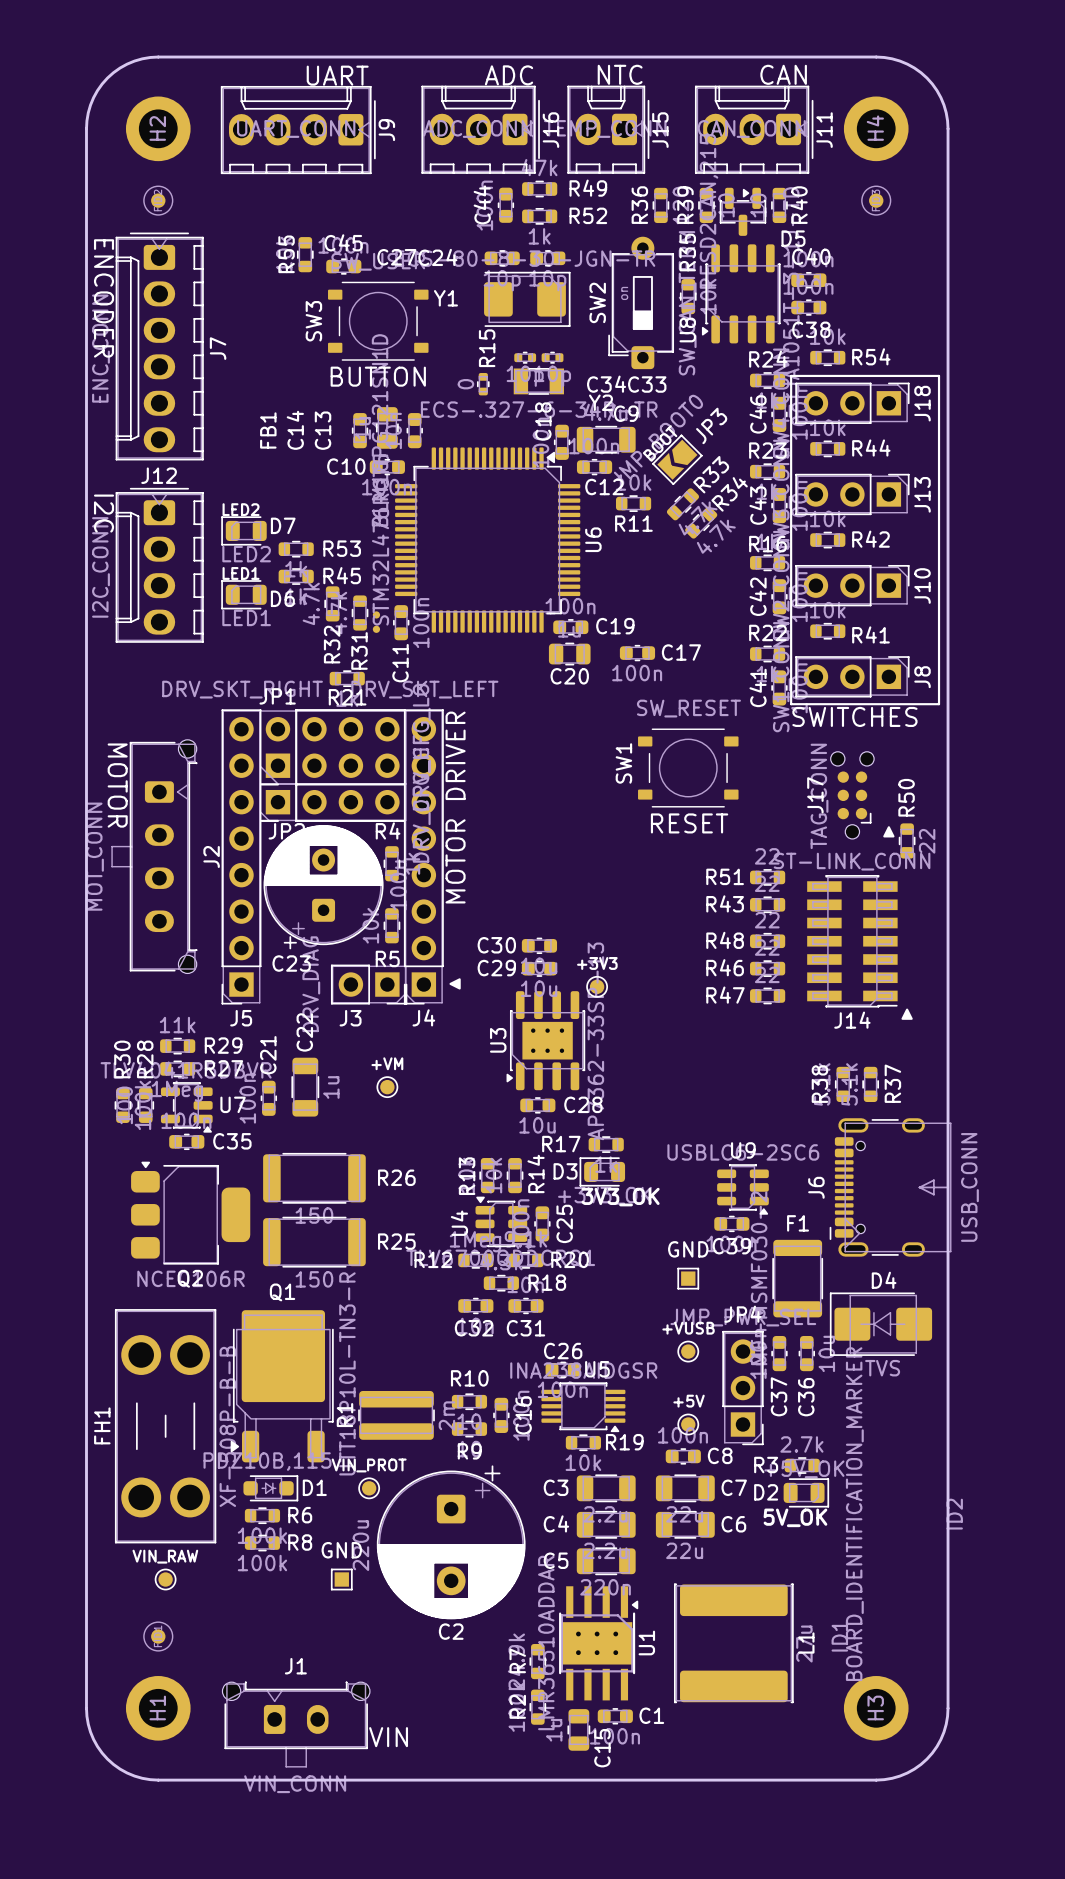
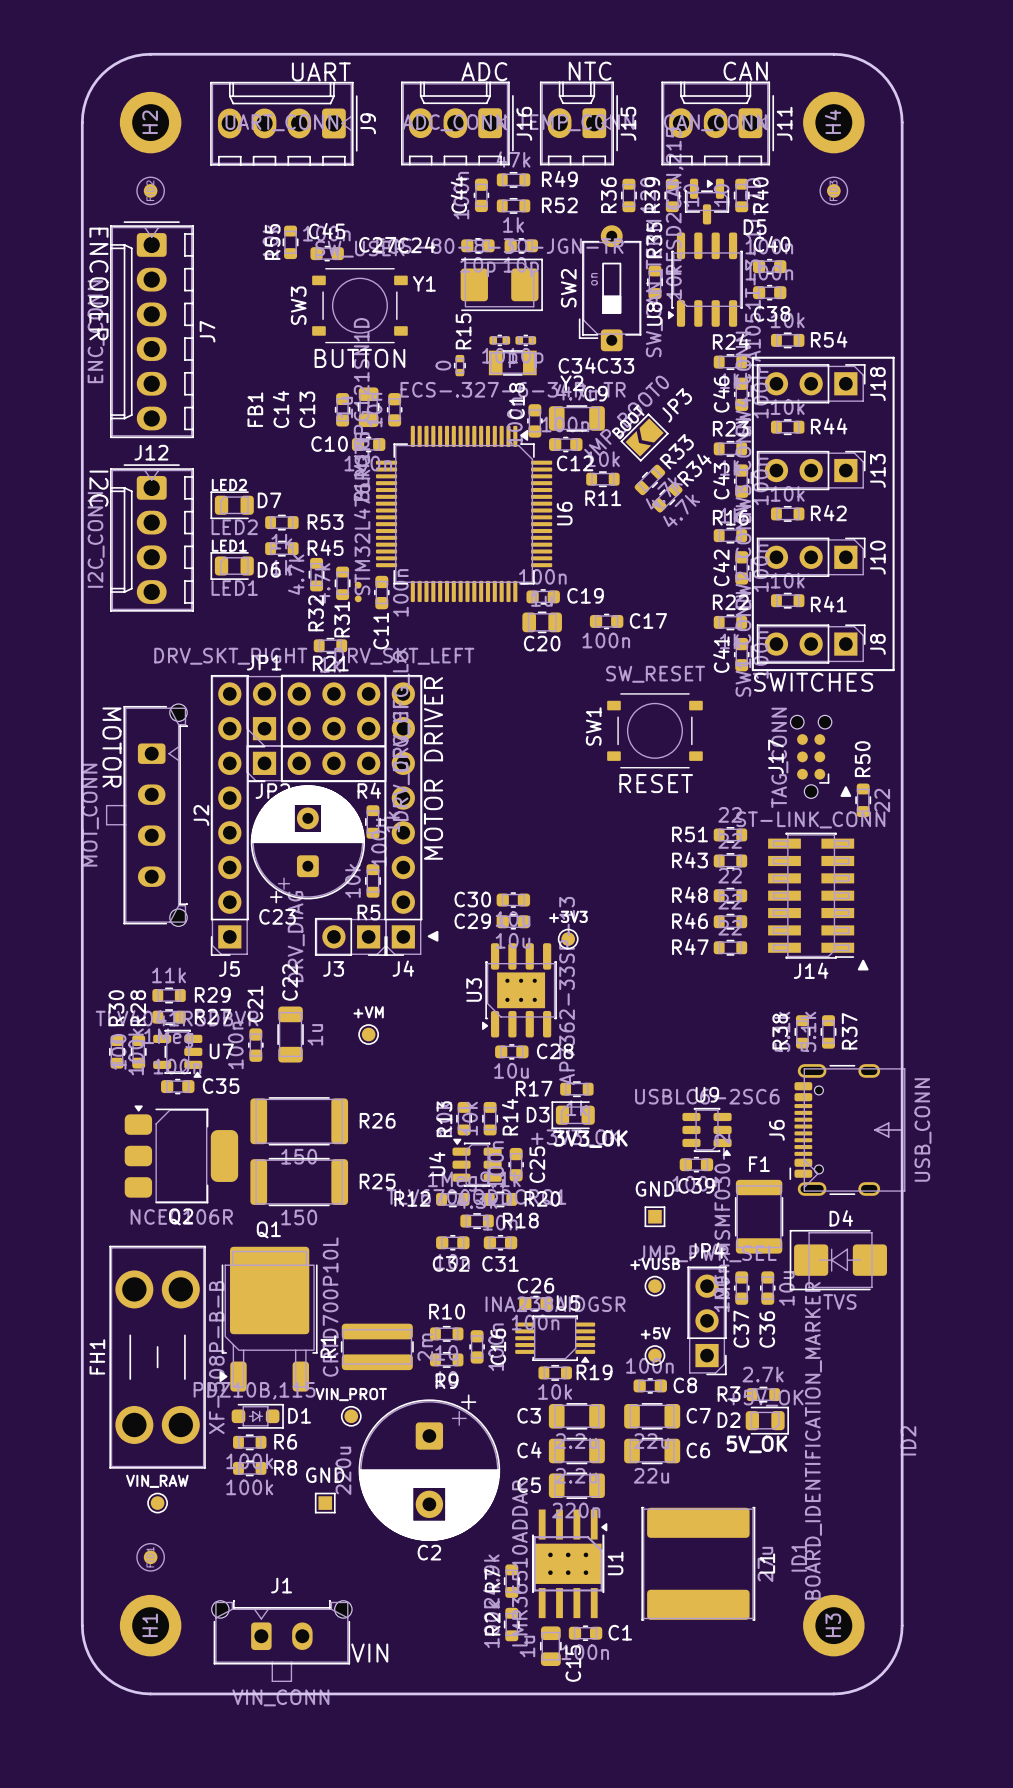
Q1 value: UTT18P10L-TN3-R (347, 1373) -> CRTD700P10L (330, 1307)

